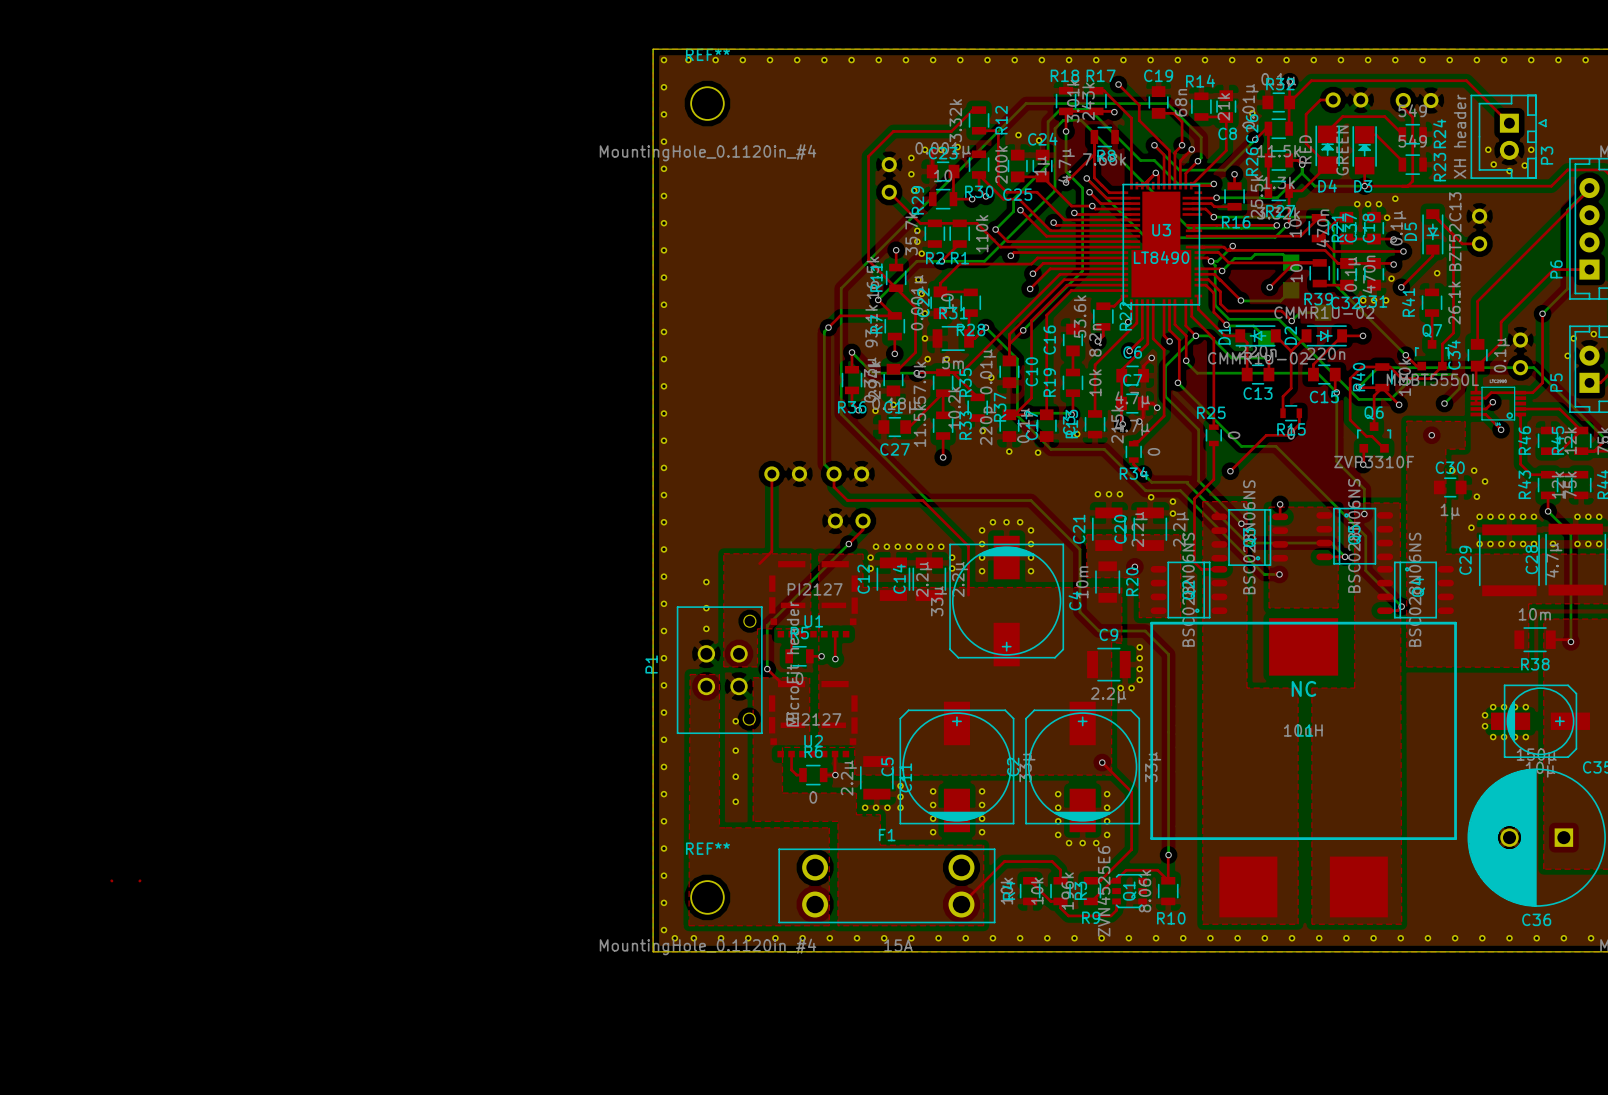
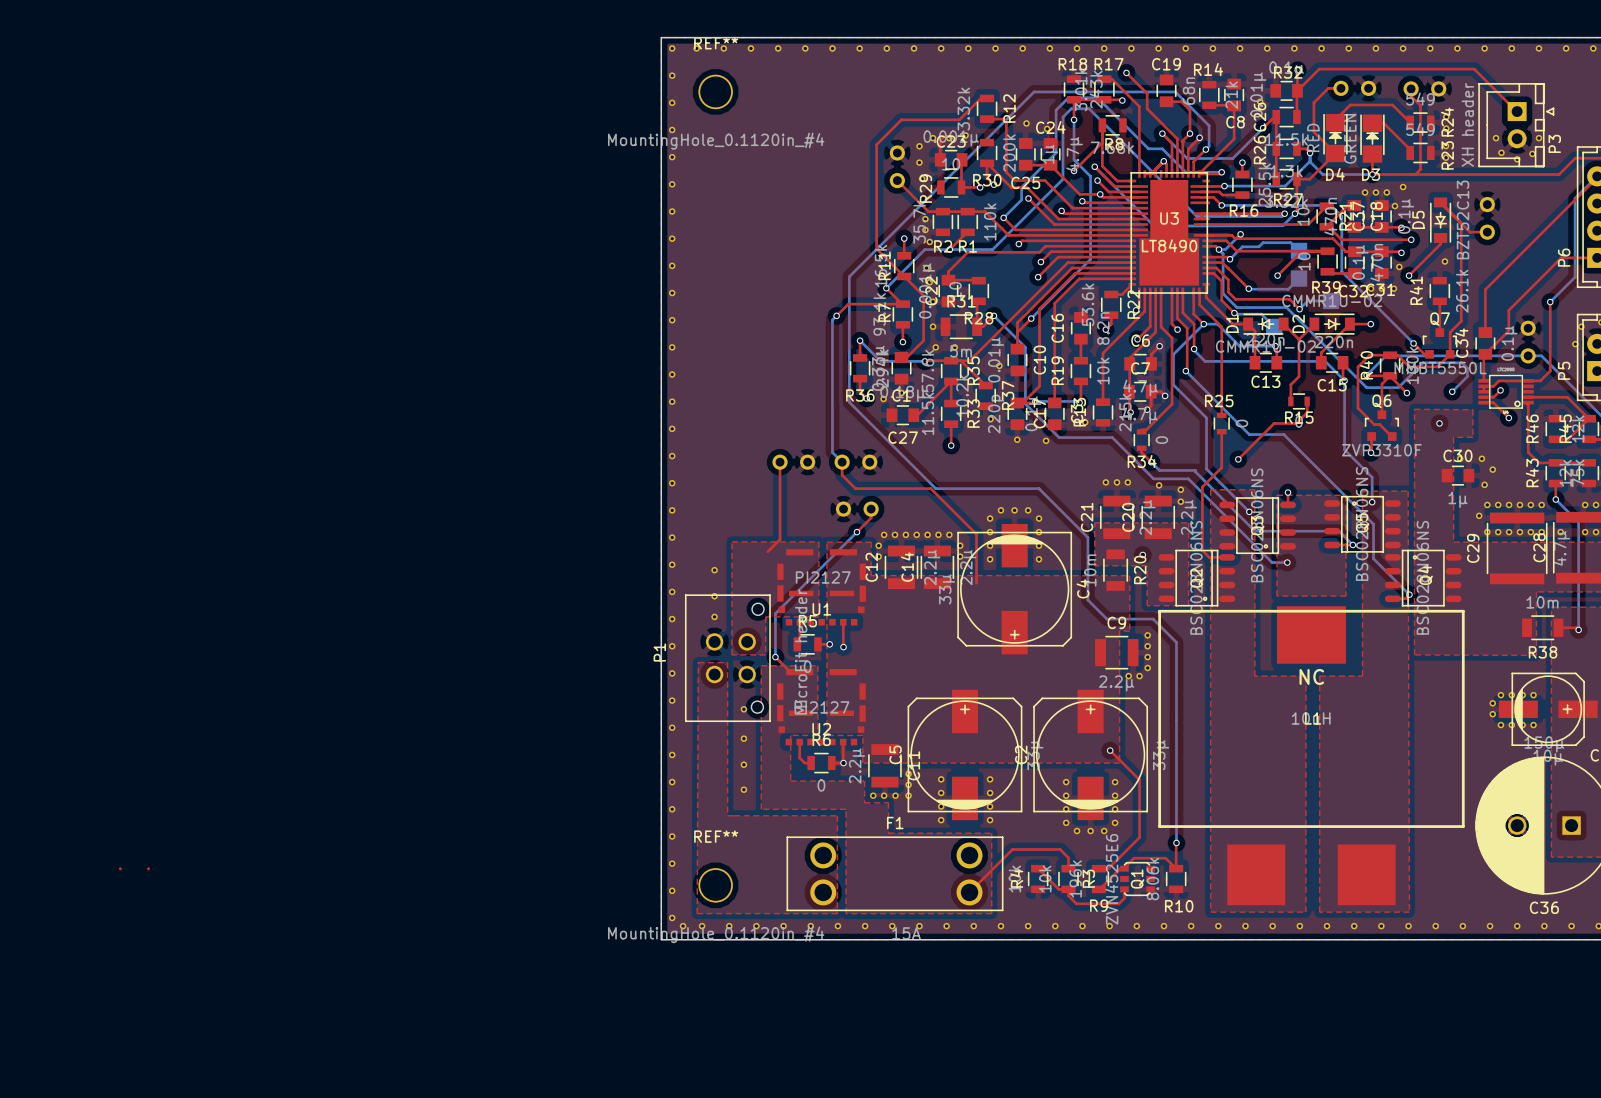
part: none -> (1446, 116)
part: none -> (1446, 128)
part: none -> (1446, 146)
part: none -> (1446, 157)

